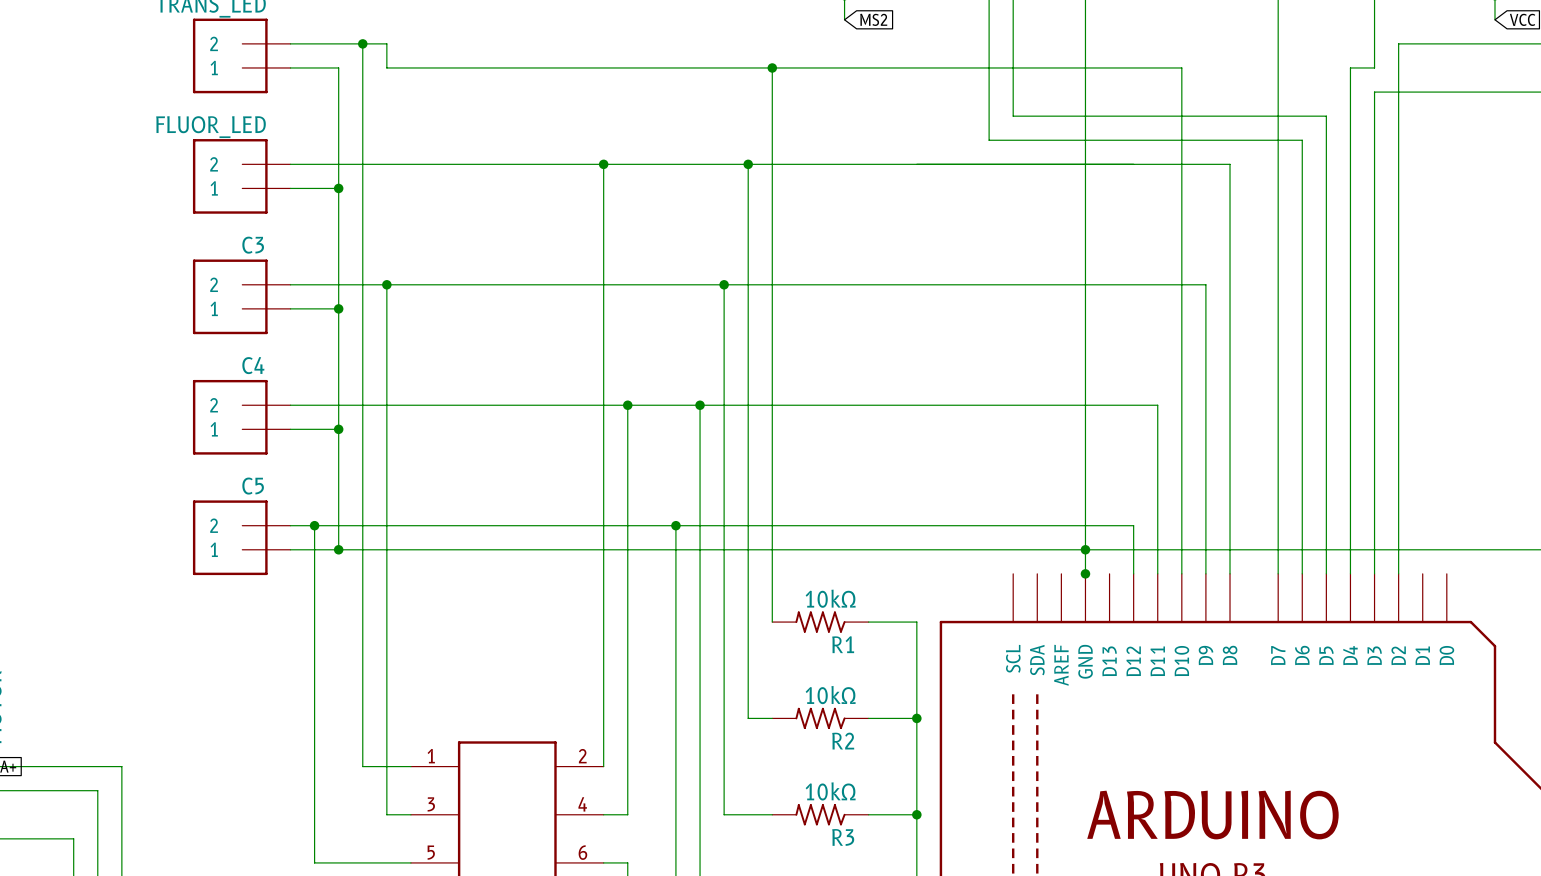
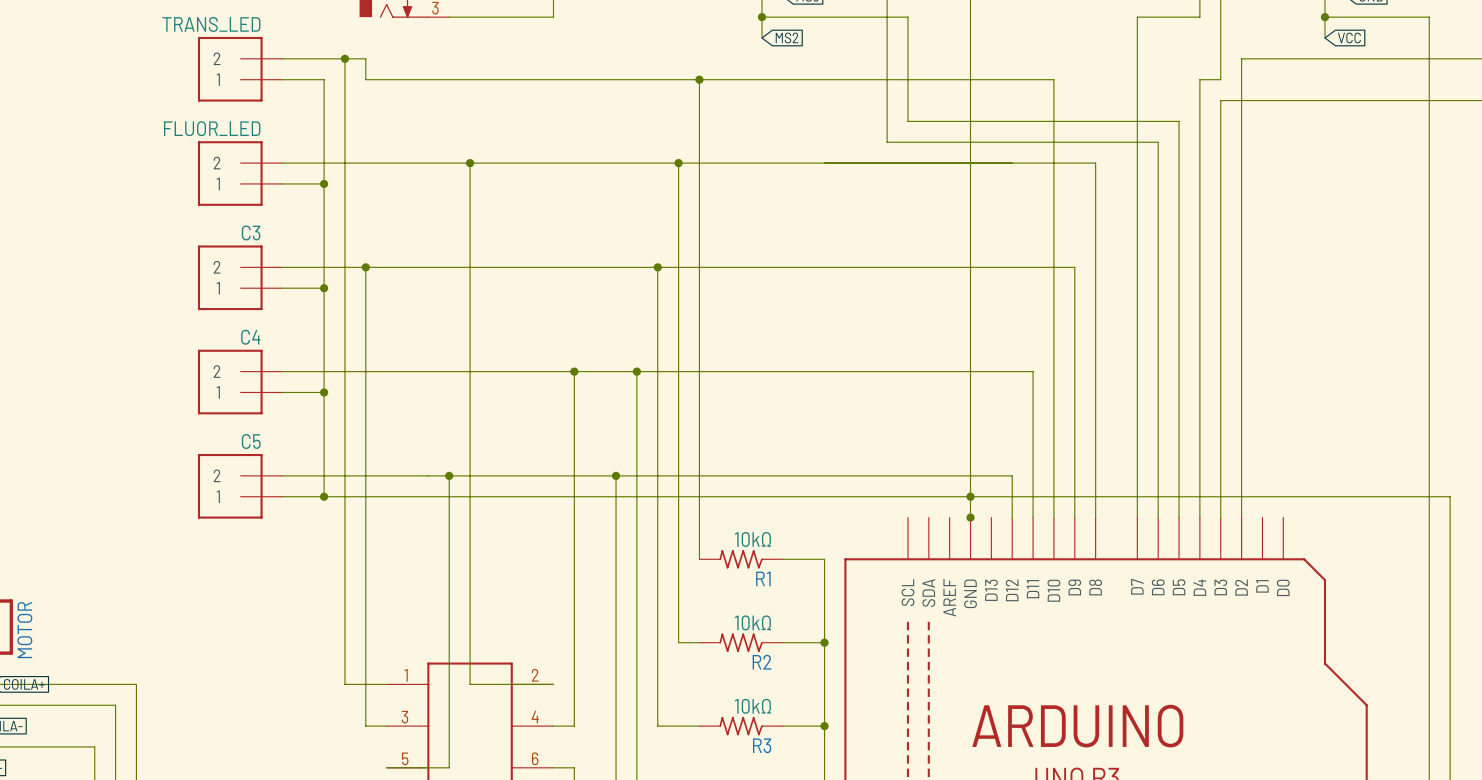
junction: none -> (470, 163)
wire: (603, 164) (603, 766) -> (470, 163) (470, 684) (553, 684)
junction: (603, 164) -> none
wire: (314, 525) (314, 862) (410, 862) -> (449, 475) (449, 767) (386, 767)
junction: (314, 525) -> none
junction: none -> (449, 475)

